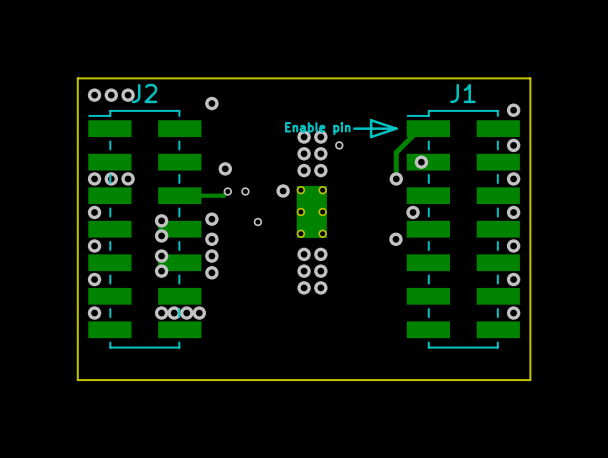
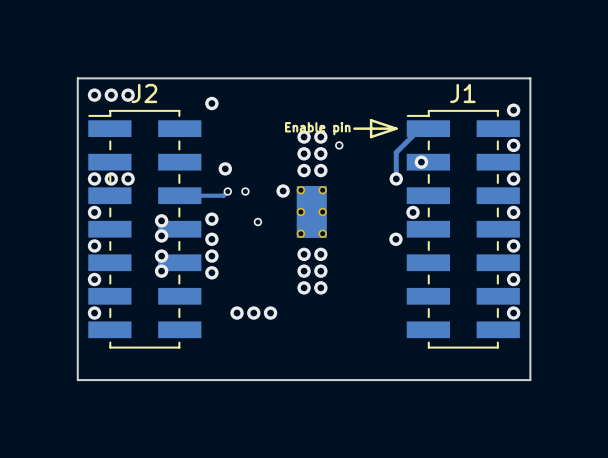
via: (161, 313) -> none
via: (174, 313) -> none
via: (186, 313) -> none
via: (199, 313) -> none
via: none -> (237, 313)
via: none -> (253, 313)
via: none -> (270, 313)

